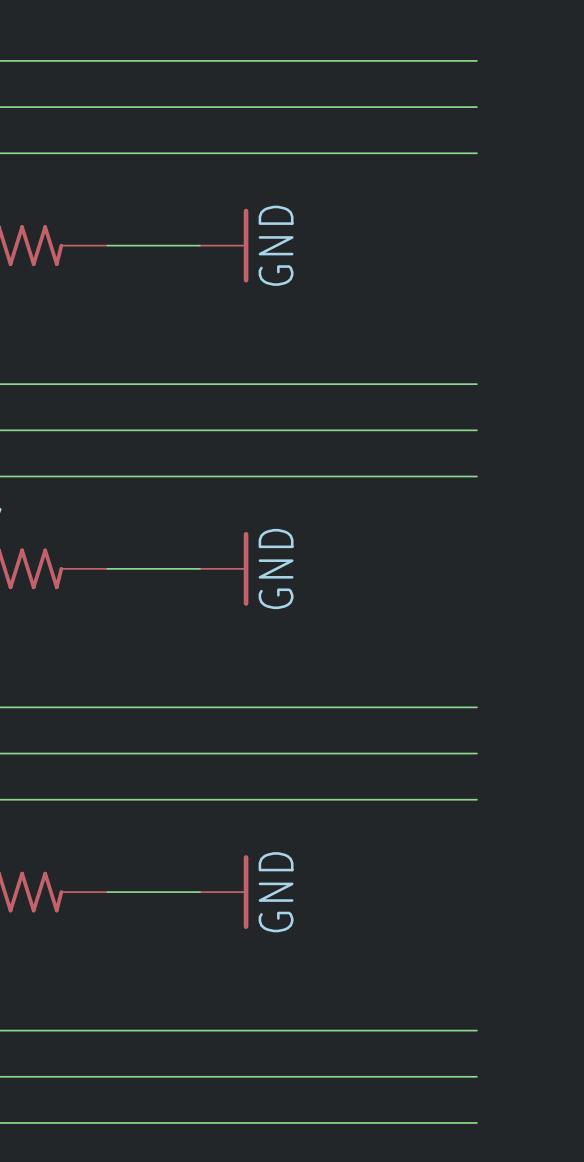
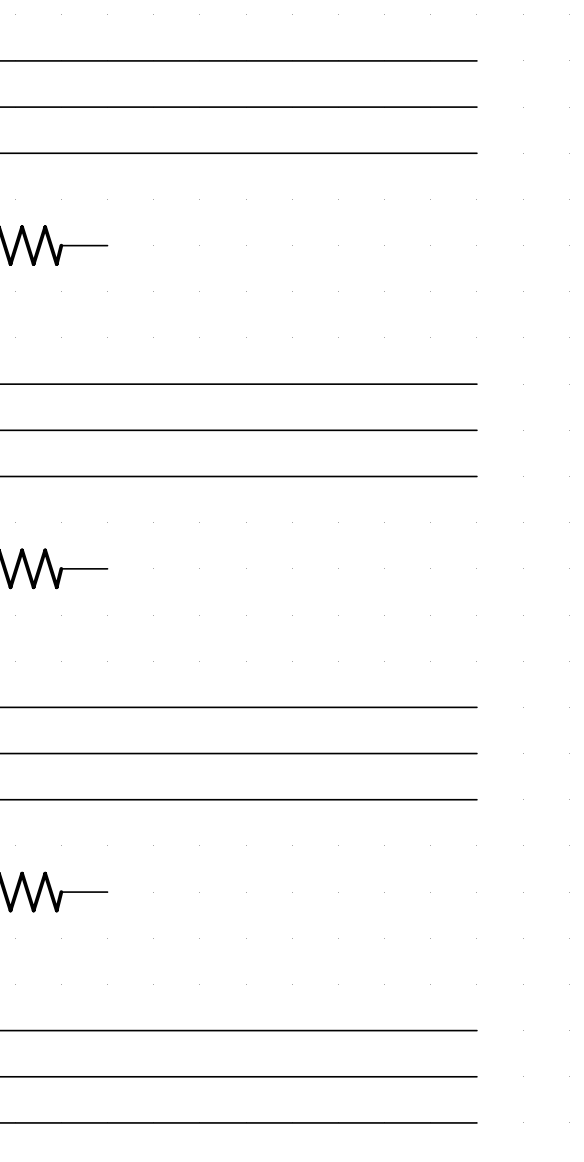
wire: (107, 245) (199, 245) -> none
power symbol: GND (224, 245) -> none
wire: (107, 568) (199, 568) -> none
power symbol: GND (224, 568) -> none
wire: (107, 892) (199, 892) -> none
power symbol: GND (224, 892) -> none

